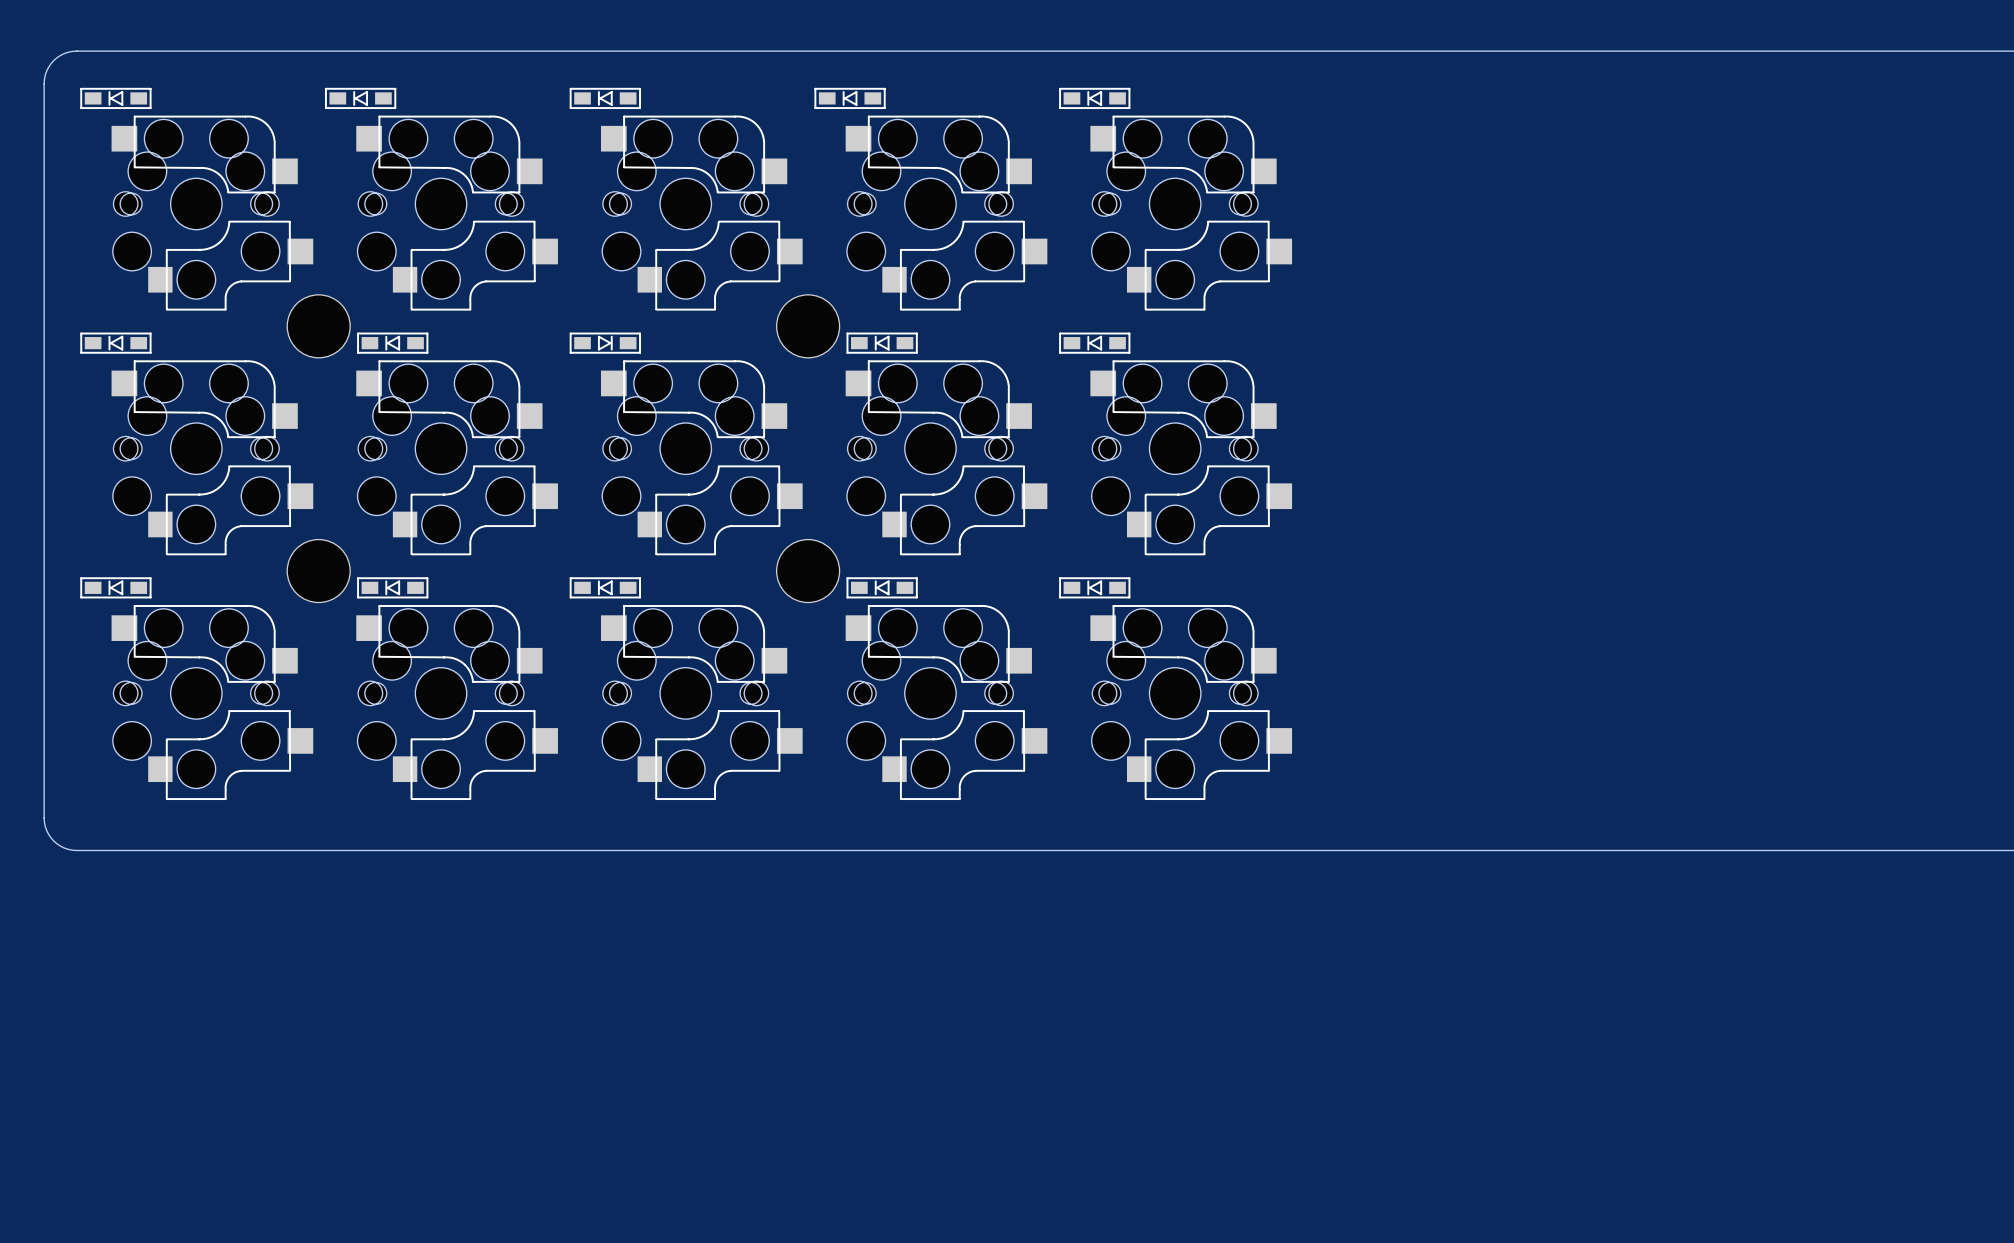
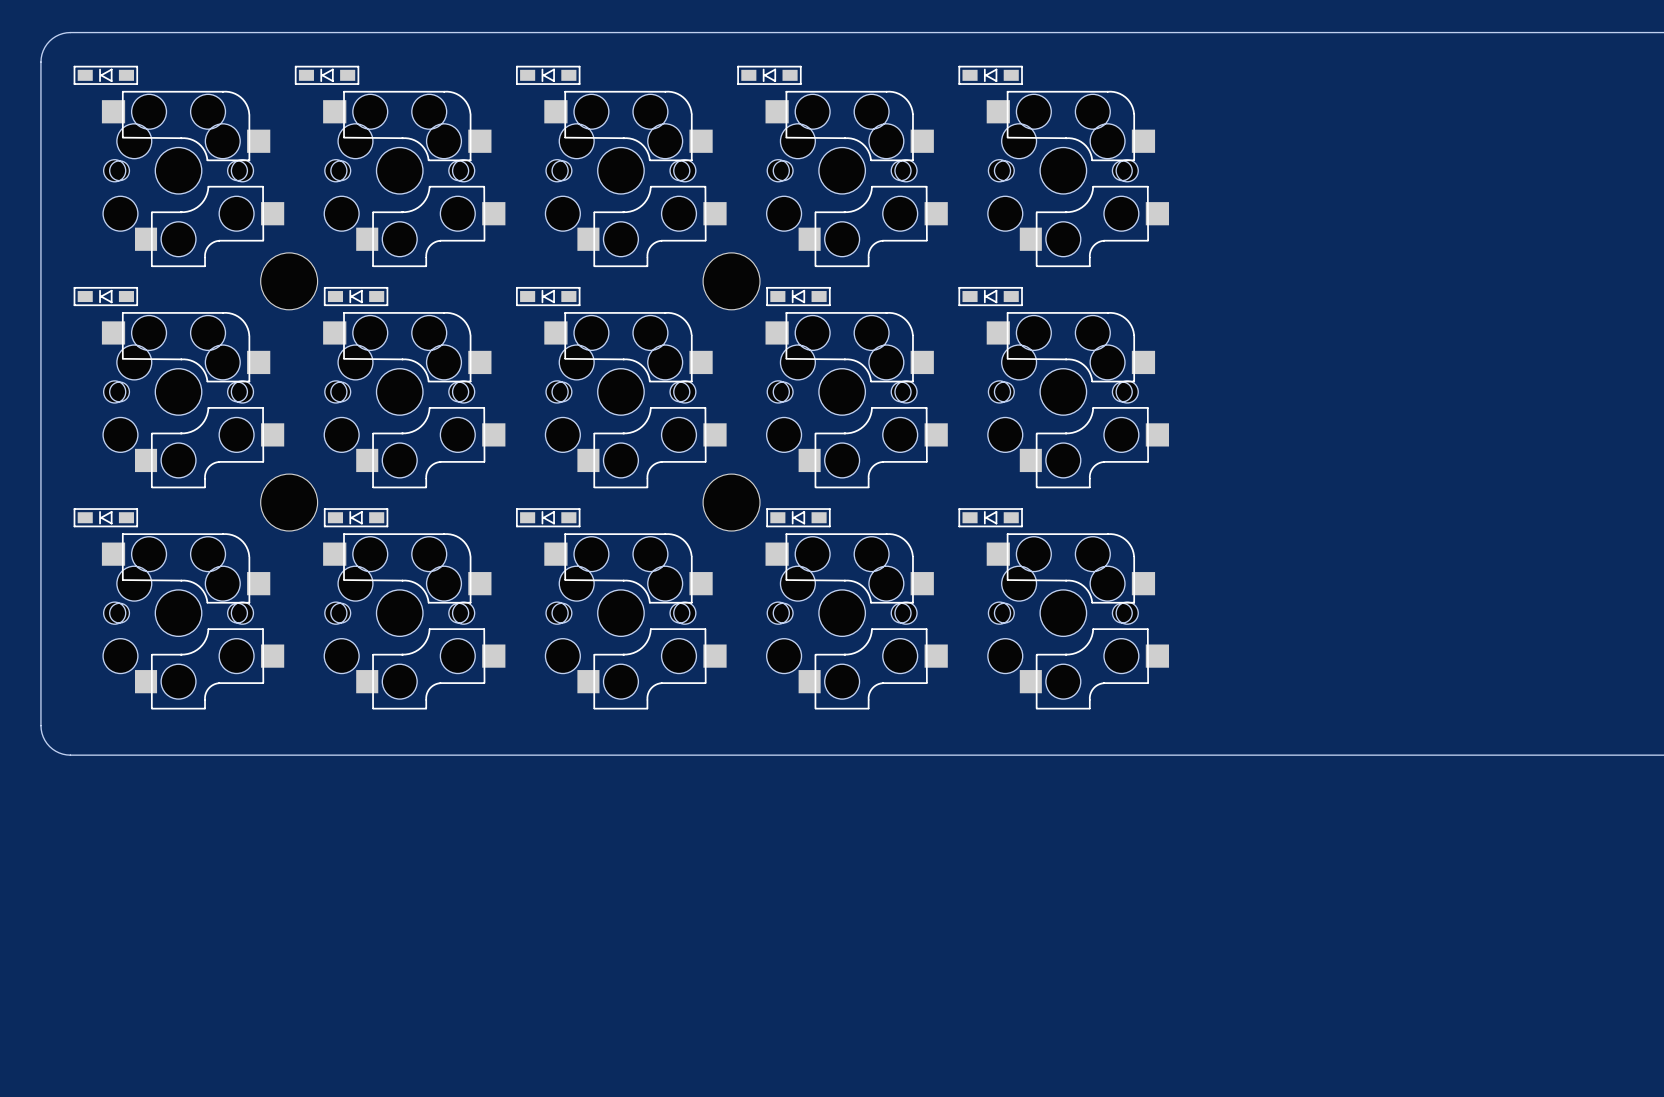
part rotation: 0° (605, 343) -> 180° (548, 296)

